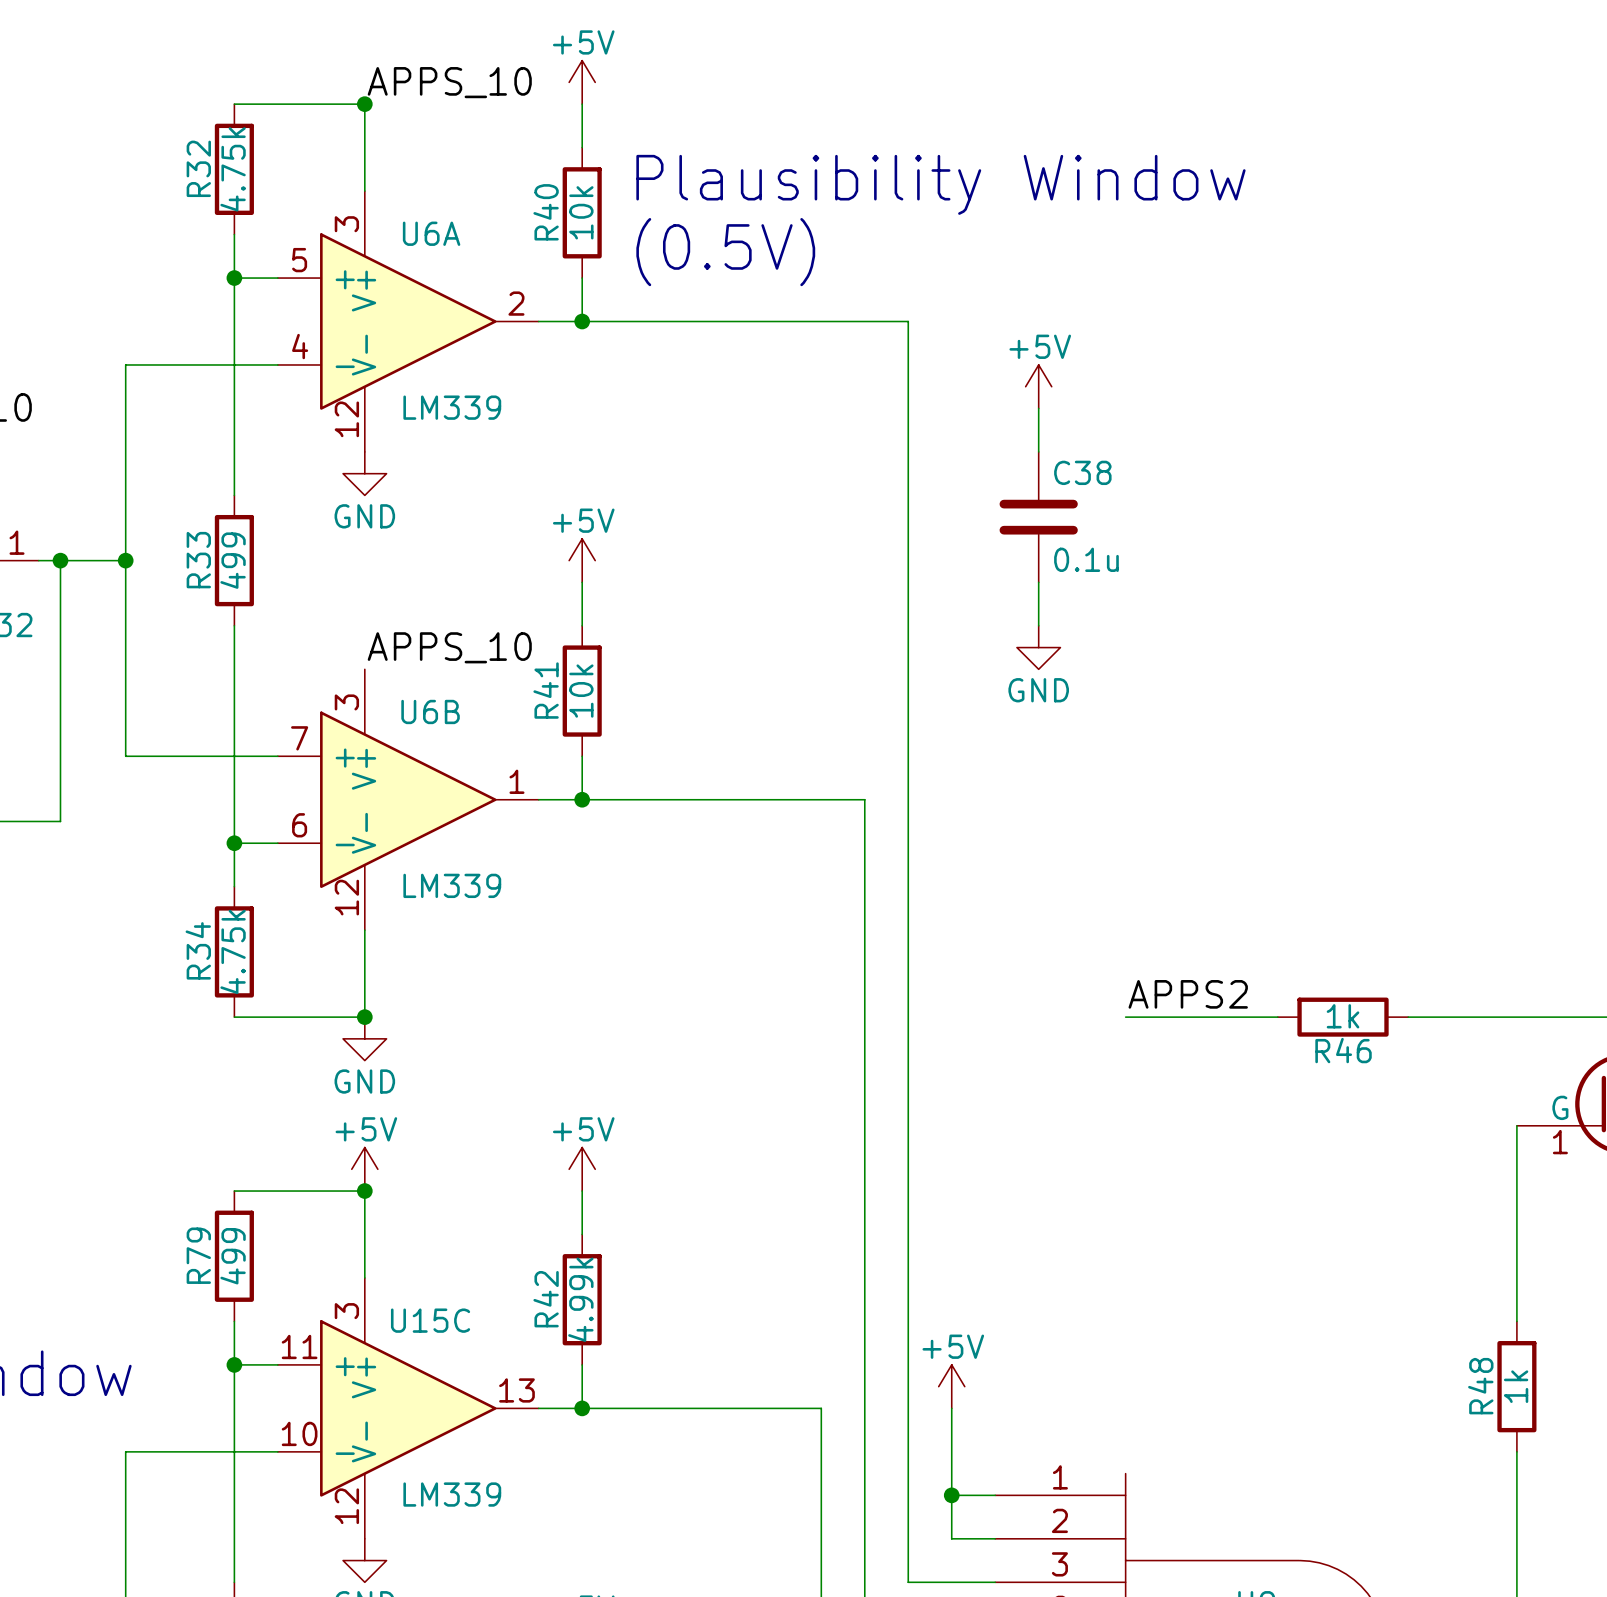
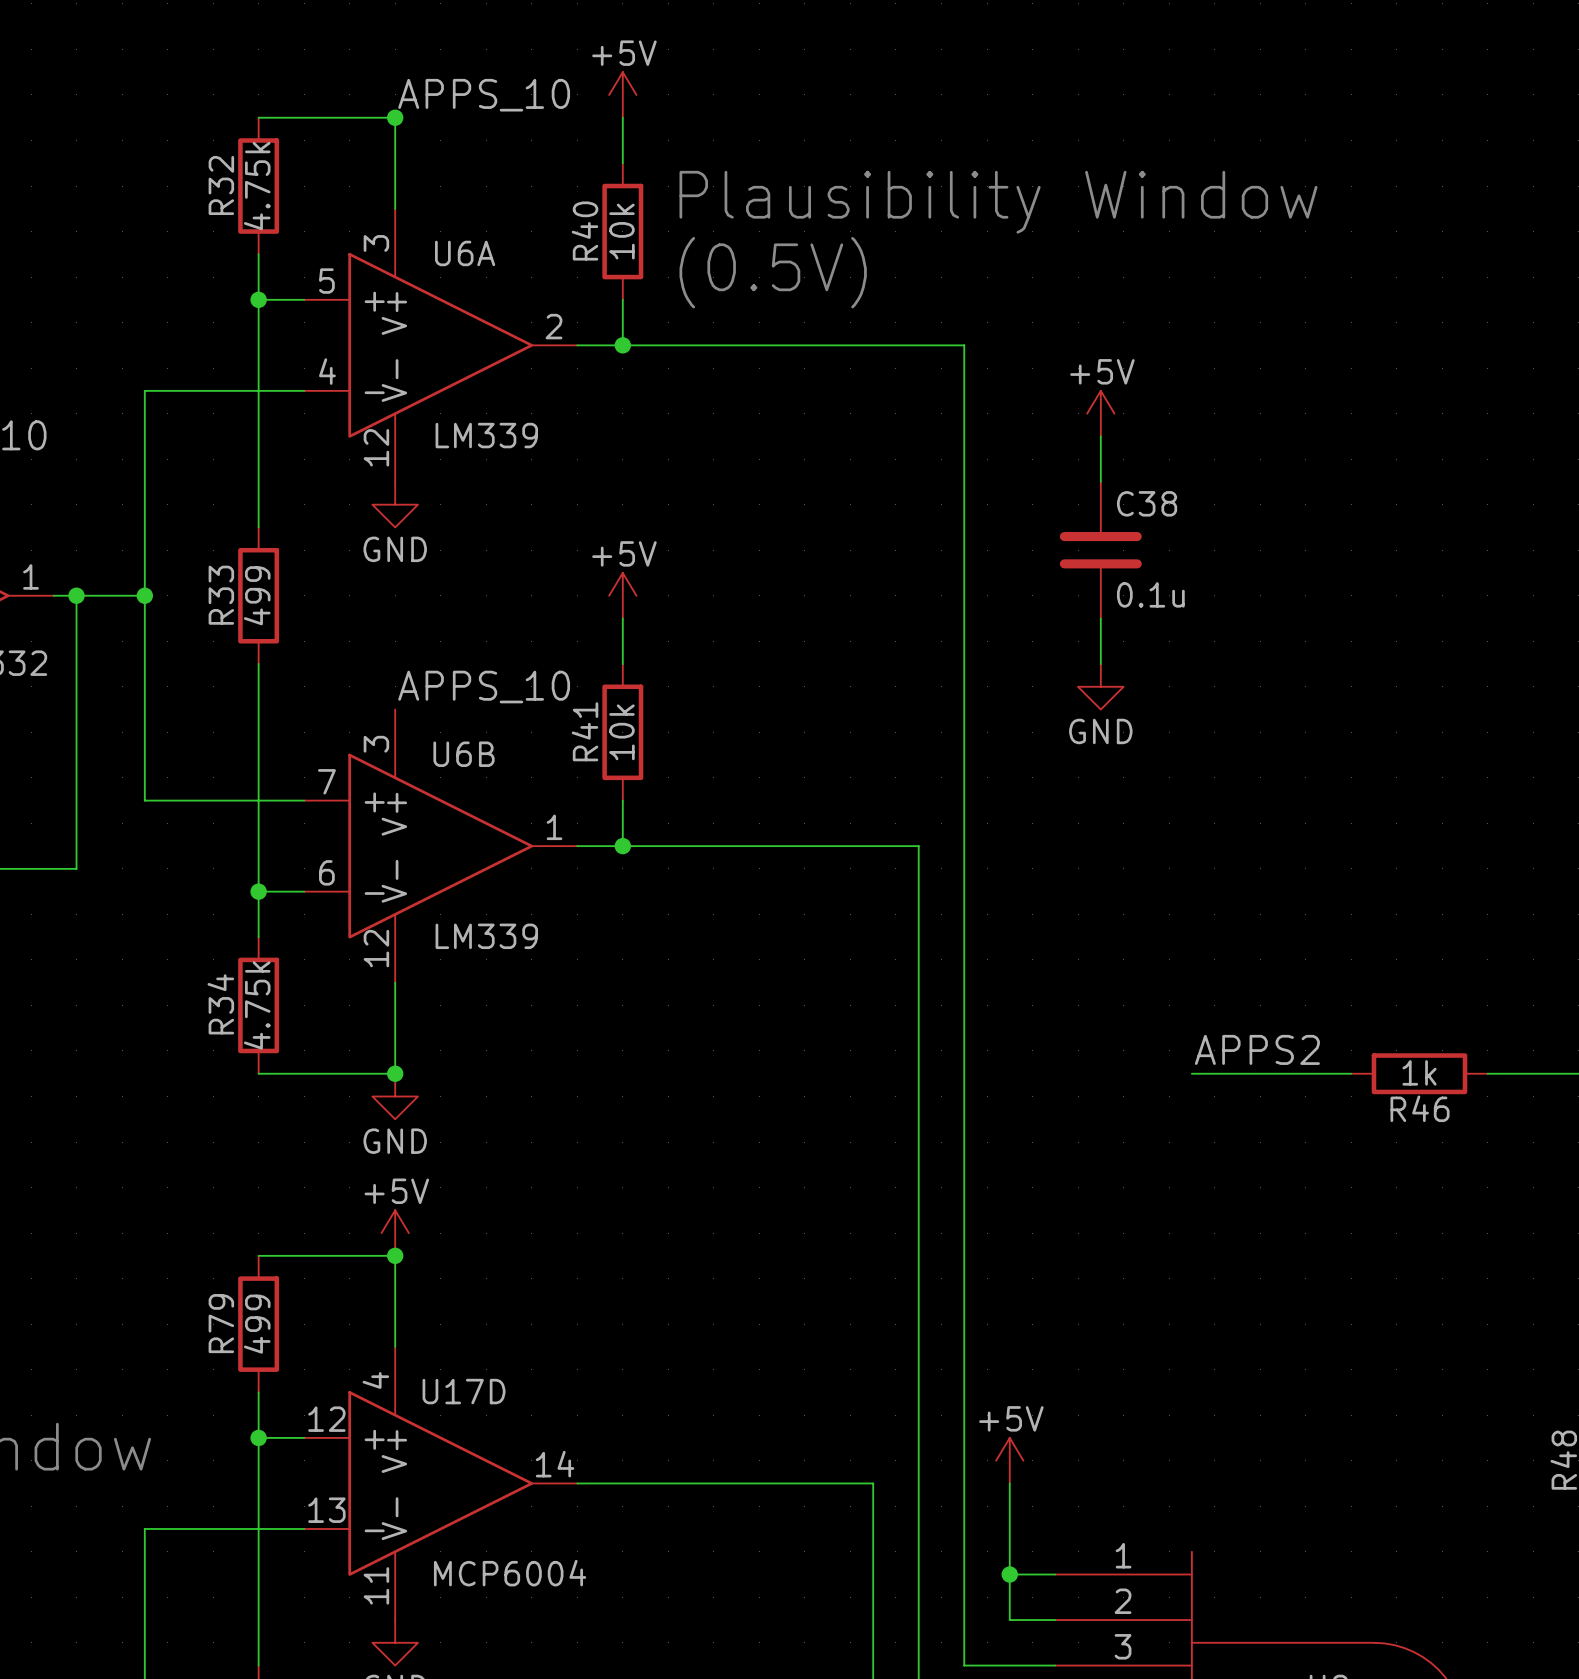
power symbol: +5V (582, 1169) -> none
wire: (582, 1191) (582, 1234) -> none
R42: 4.99k (582, 1299) -> none
U15C pin number: 3 (346, 1311) -> 4 (375, 1380)
U15C name: U15C (430, 1320) -> U17D (464, 1391)
U15C pin number: 11 (299, 1346) -> 12 (326, 1419)
wire: (582, 1364) (582, 1408) -> none
U15C pin number: 13 (516, 1390) -> 14 (555, 1464)
junction: (582, 1408) -> none
U15C pin number: 10 (299, 1433) -> 13 (326, 1510)
U15C value: LM339 (452, 1494) -> MCP6004 (510, 1573)
U15C pin number: 12 (346, 1506) -> 11 (376, 1585)

